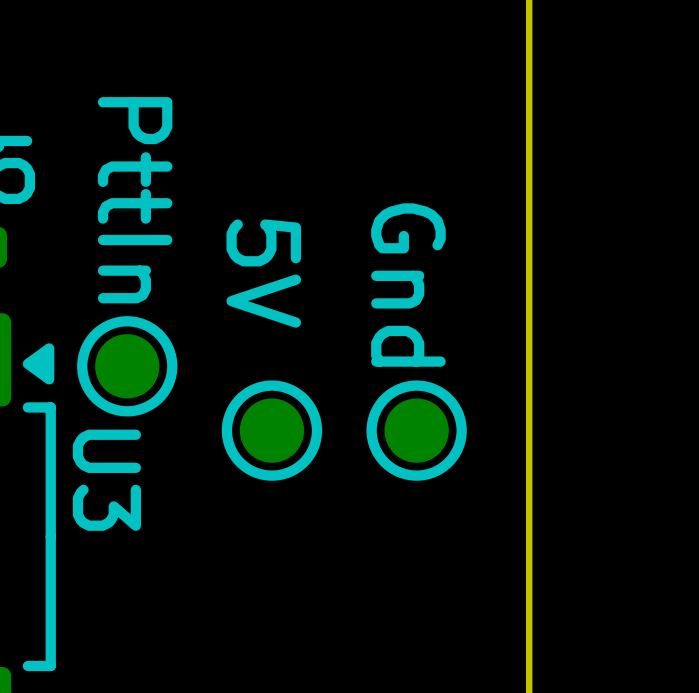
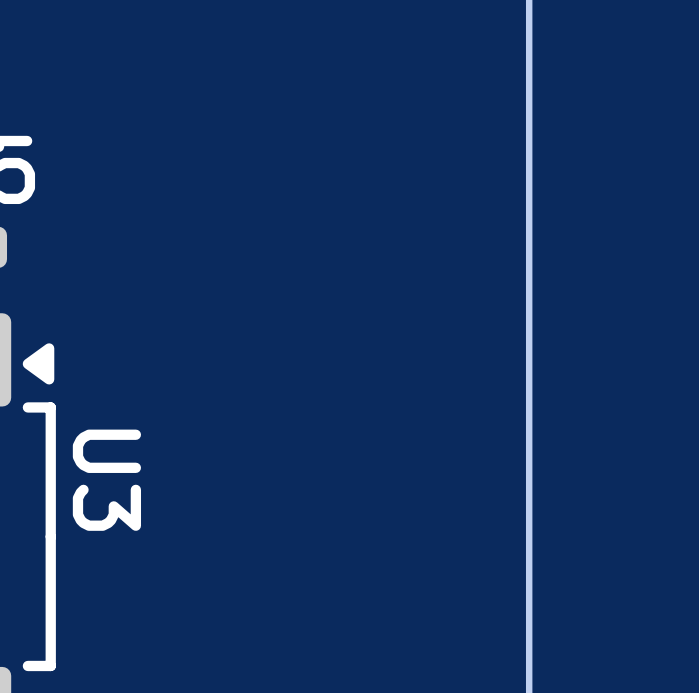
text: PttIn (135, 200) -> none
text: 5V (263, 273) -> none
text: Gnd (408, 285) -> none
part: (127, 366) -> none
part: (271, 430) -> none
part: (416, 430) -> none

